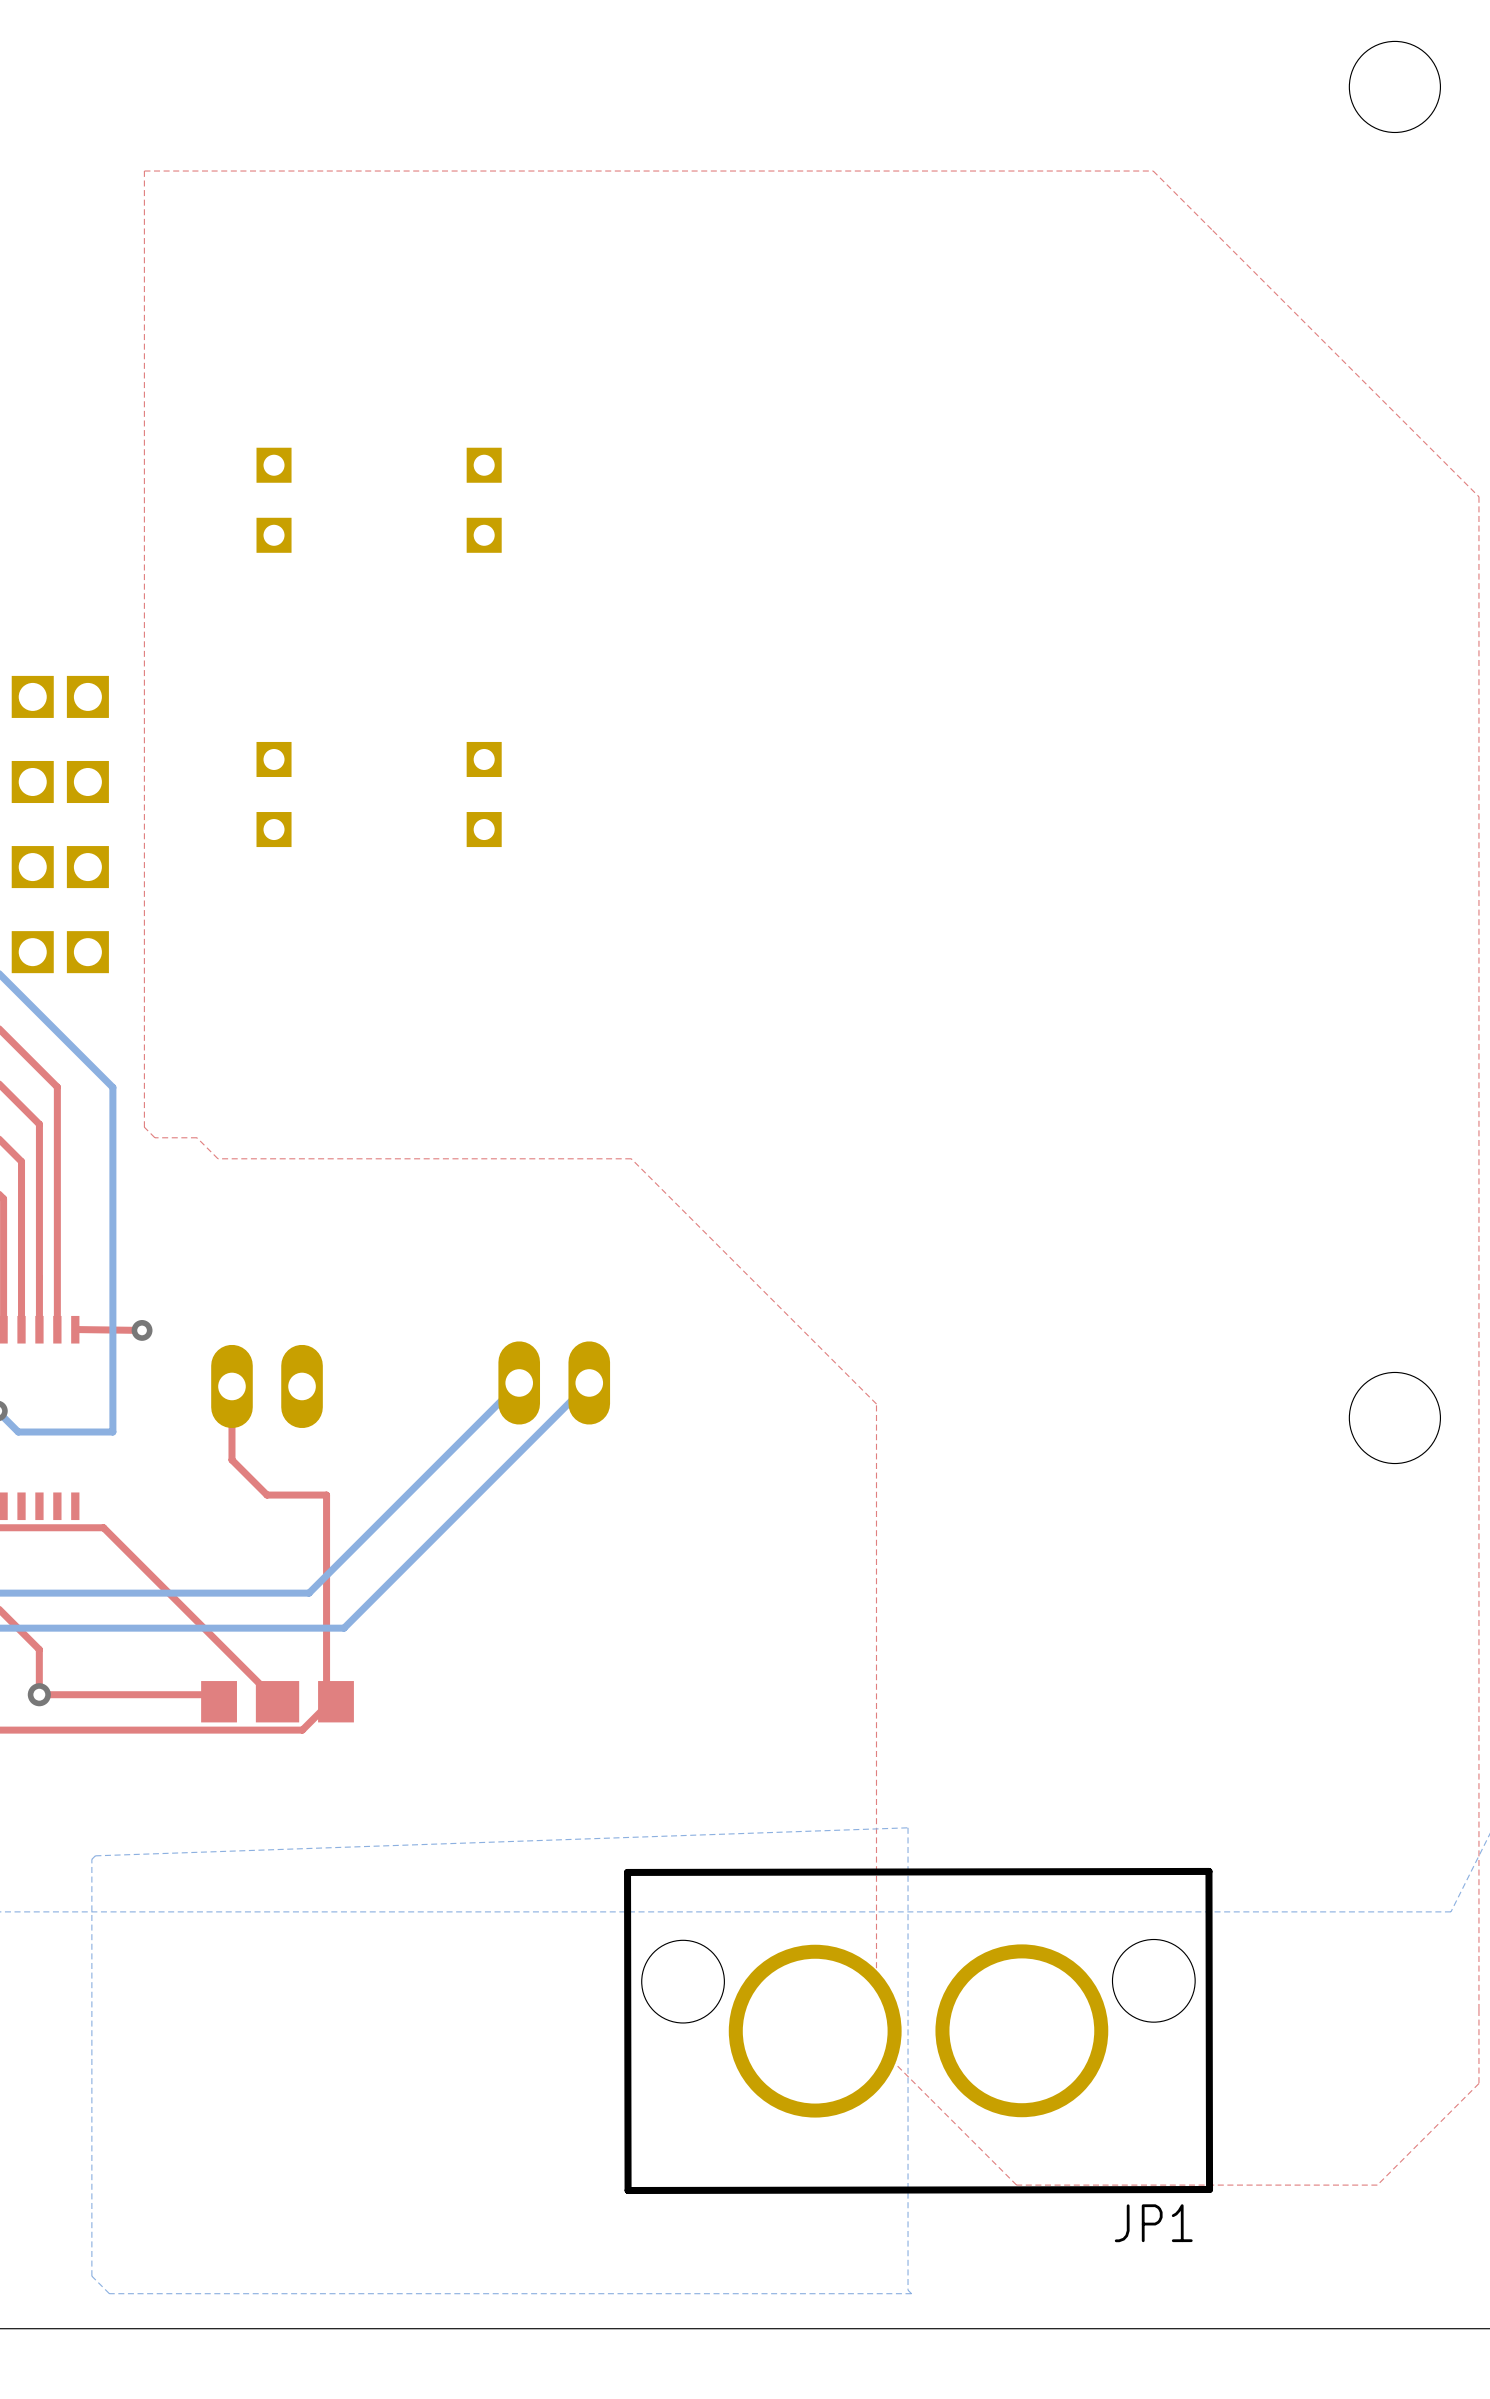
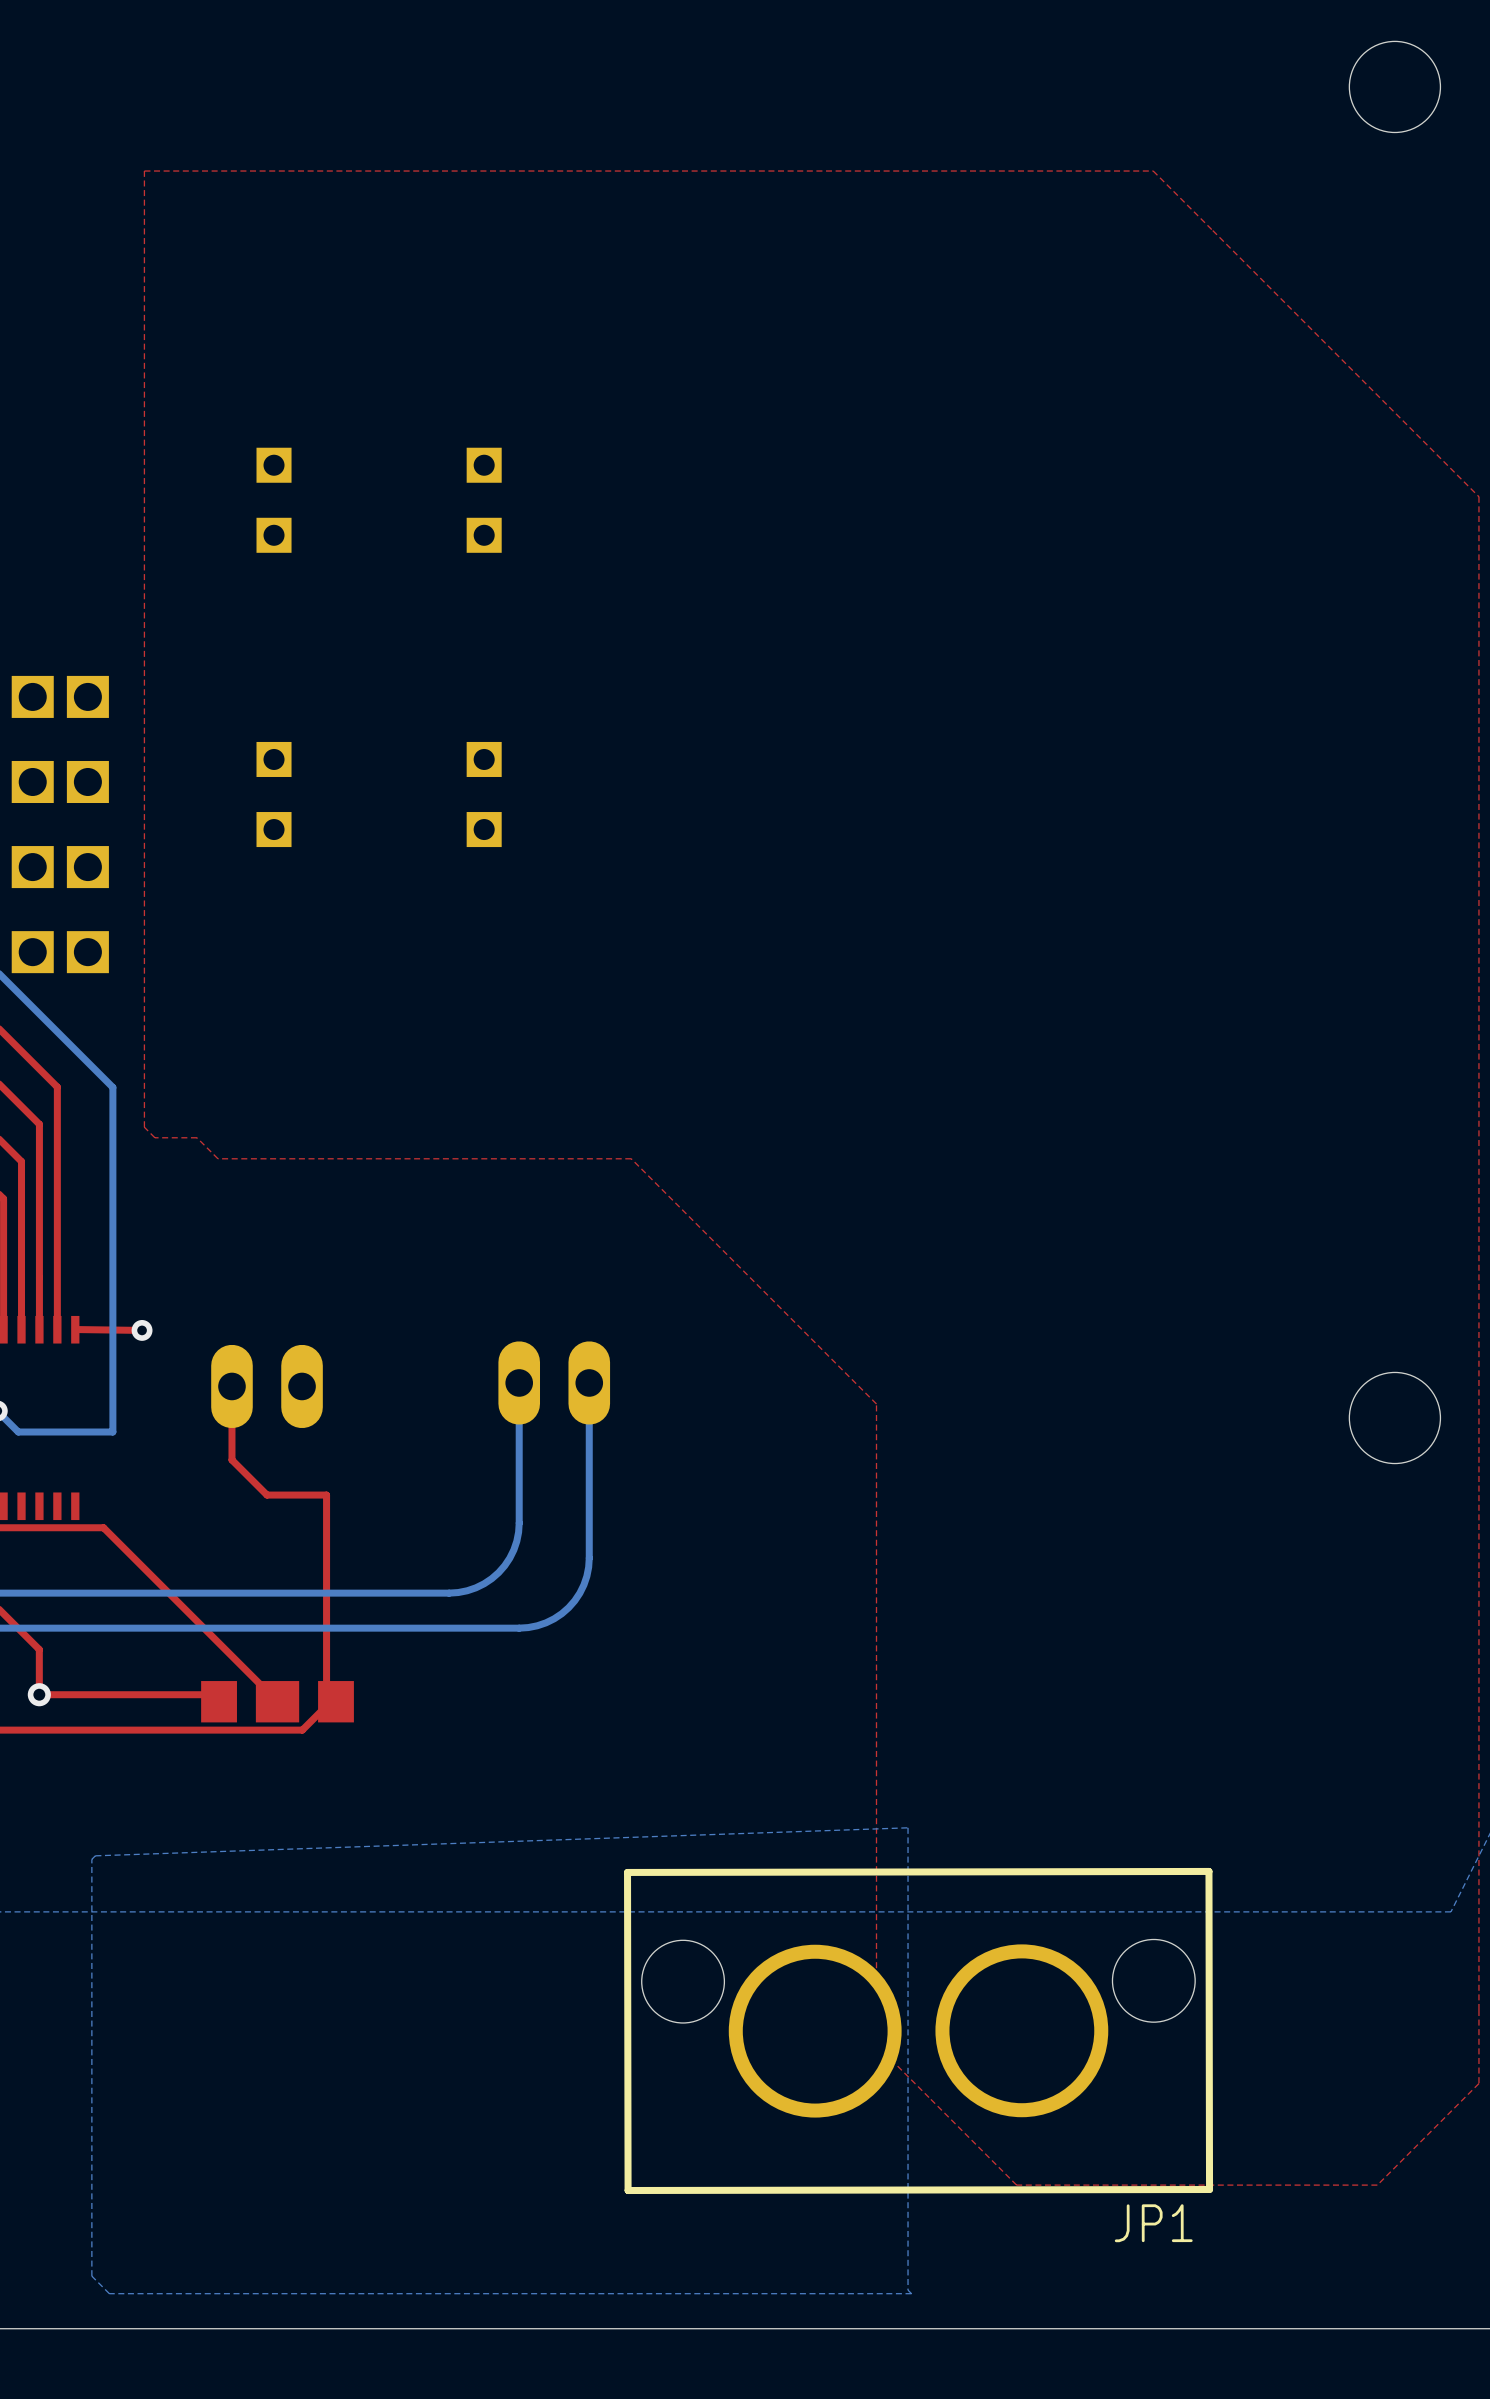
bottom track: (519, 1382) (309, 1593) -> (519, 1382) (518, 1532) (513, 1549) (498, 1572) (484, 1583) (458, 1592) (309, 1593)
bottom track: (589, 1382) (344, 1628) -> (589, 1382) (588, 1567) (579, 1593) (568, 1607) (554, 1618) (528, 1627) (344, 1628)

